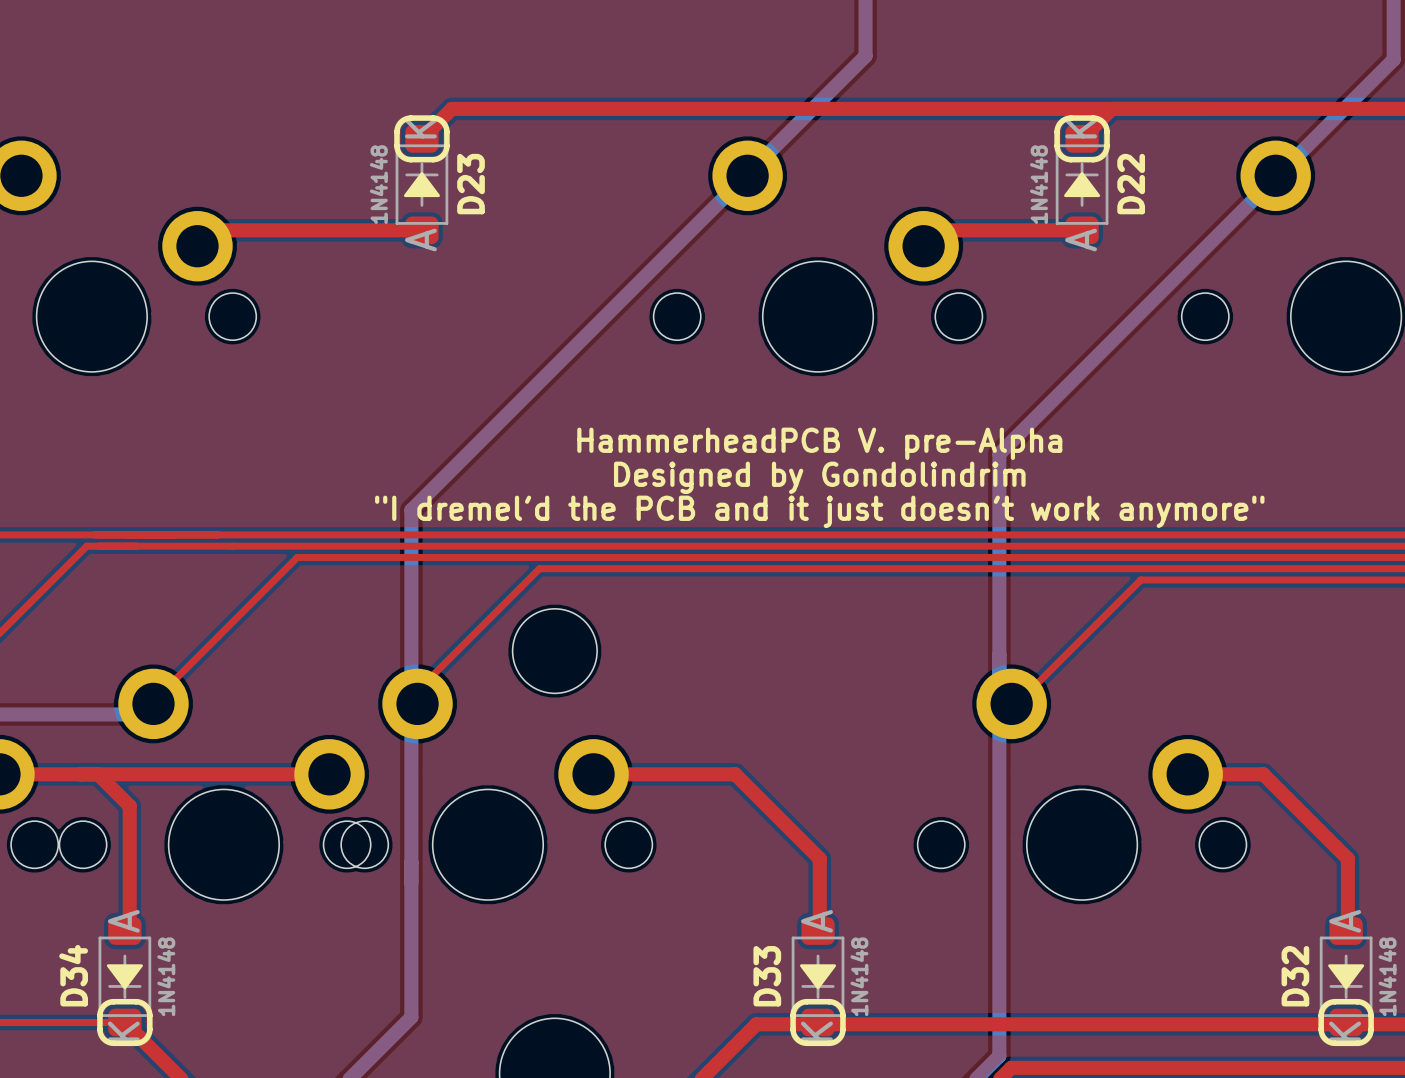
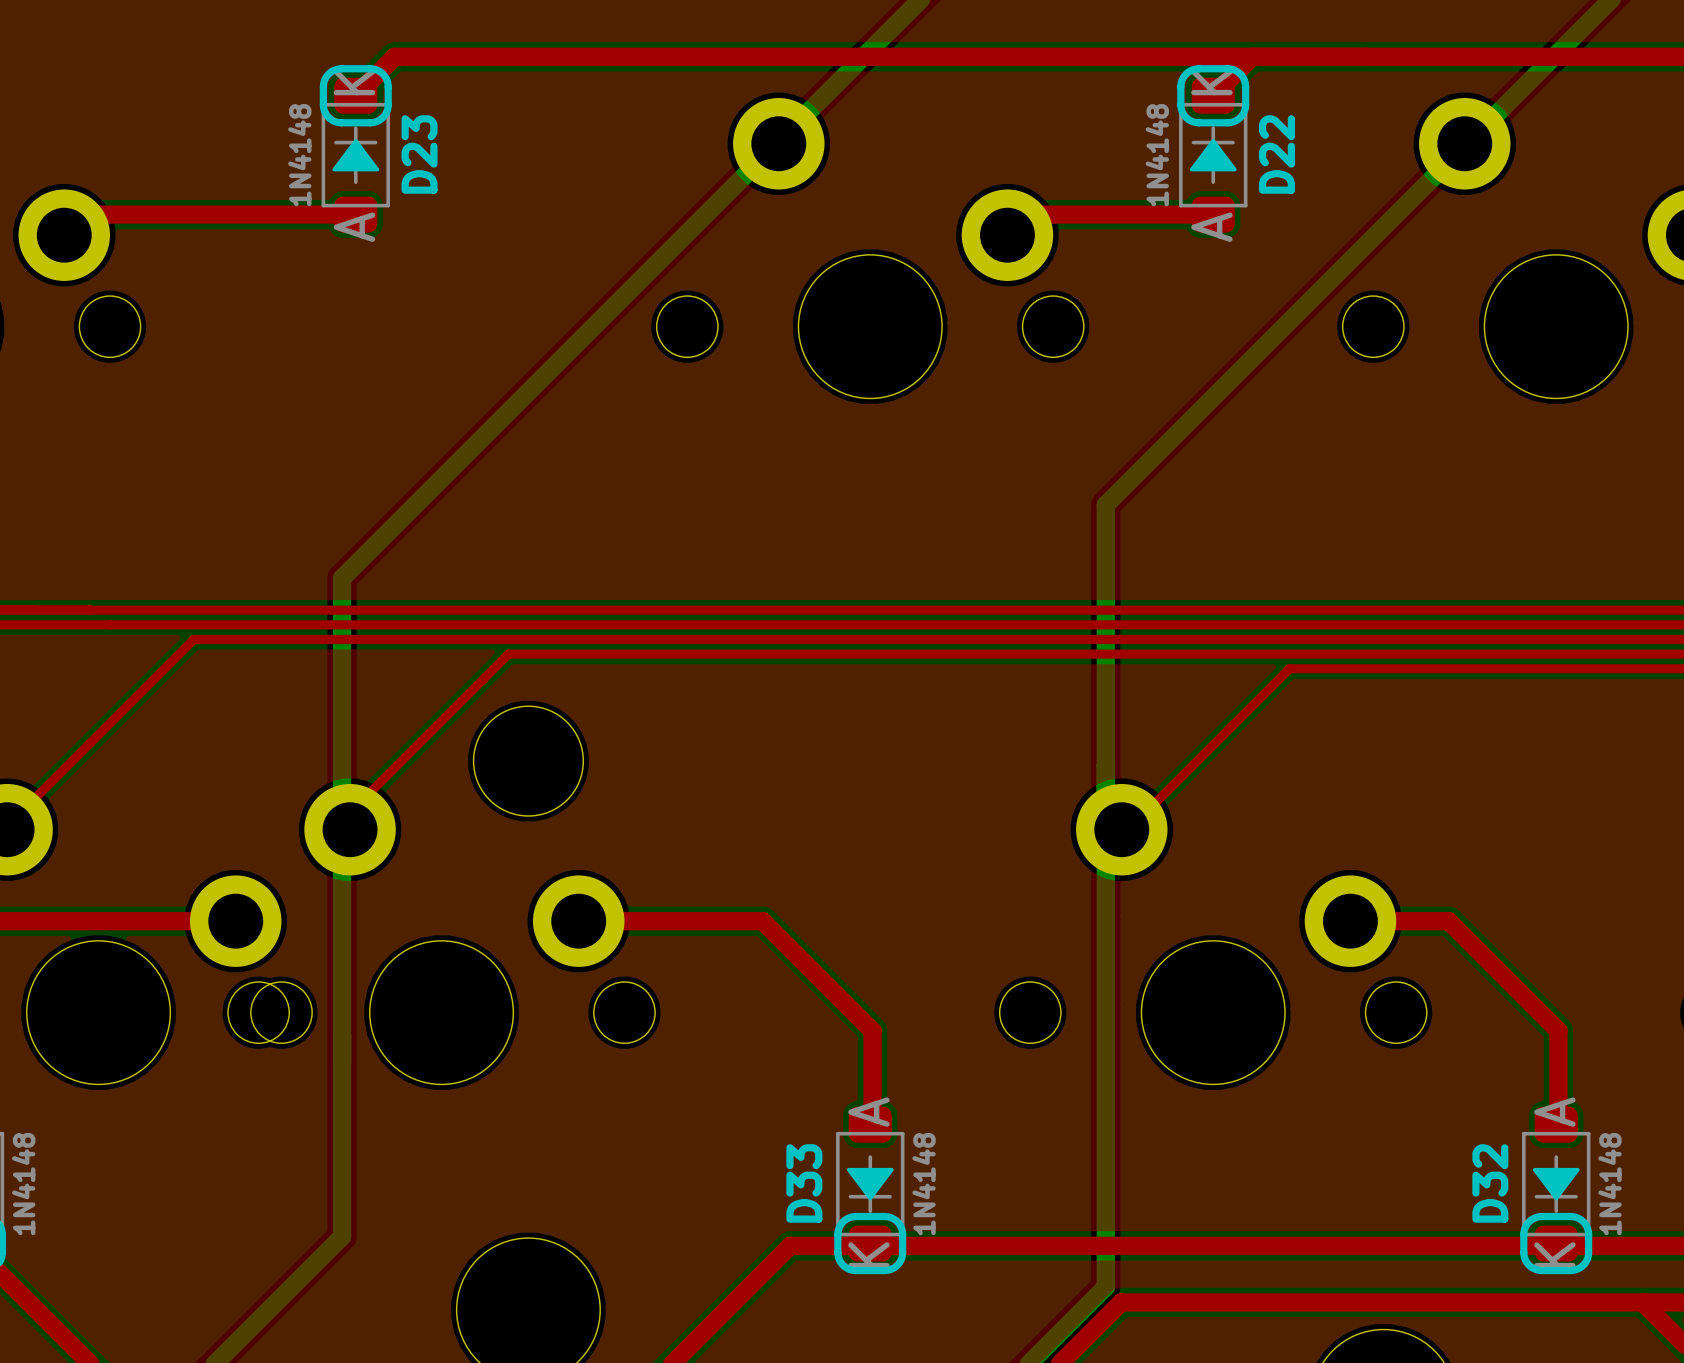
text: HammerheadPCB V. pre-Alpha (819, 443) -> none
text: Designed by Gondolindrim (819, 477) -> none
text: "I dremel'd the PCB and it just doesn't work anymore" (819, 511) -> none

